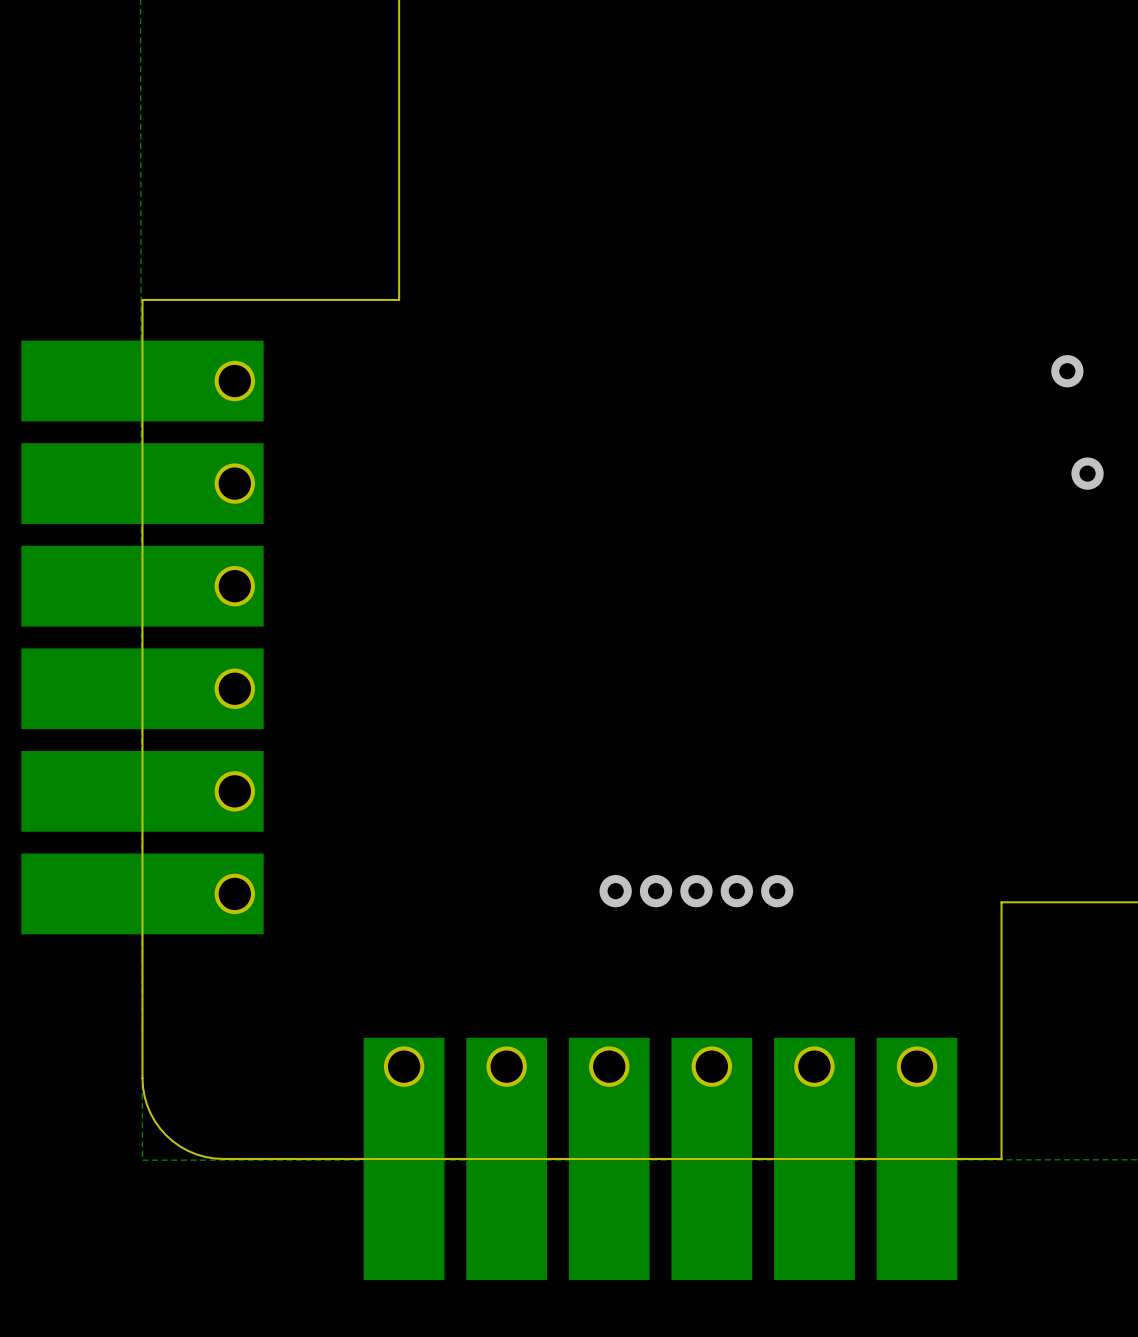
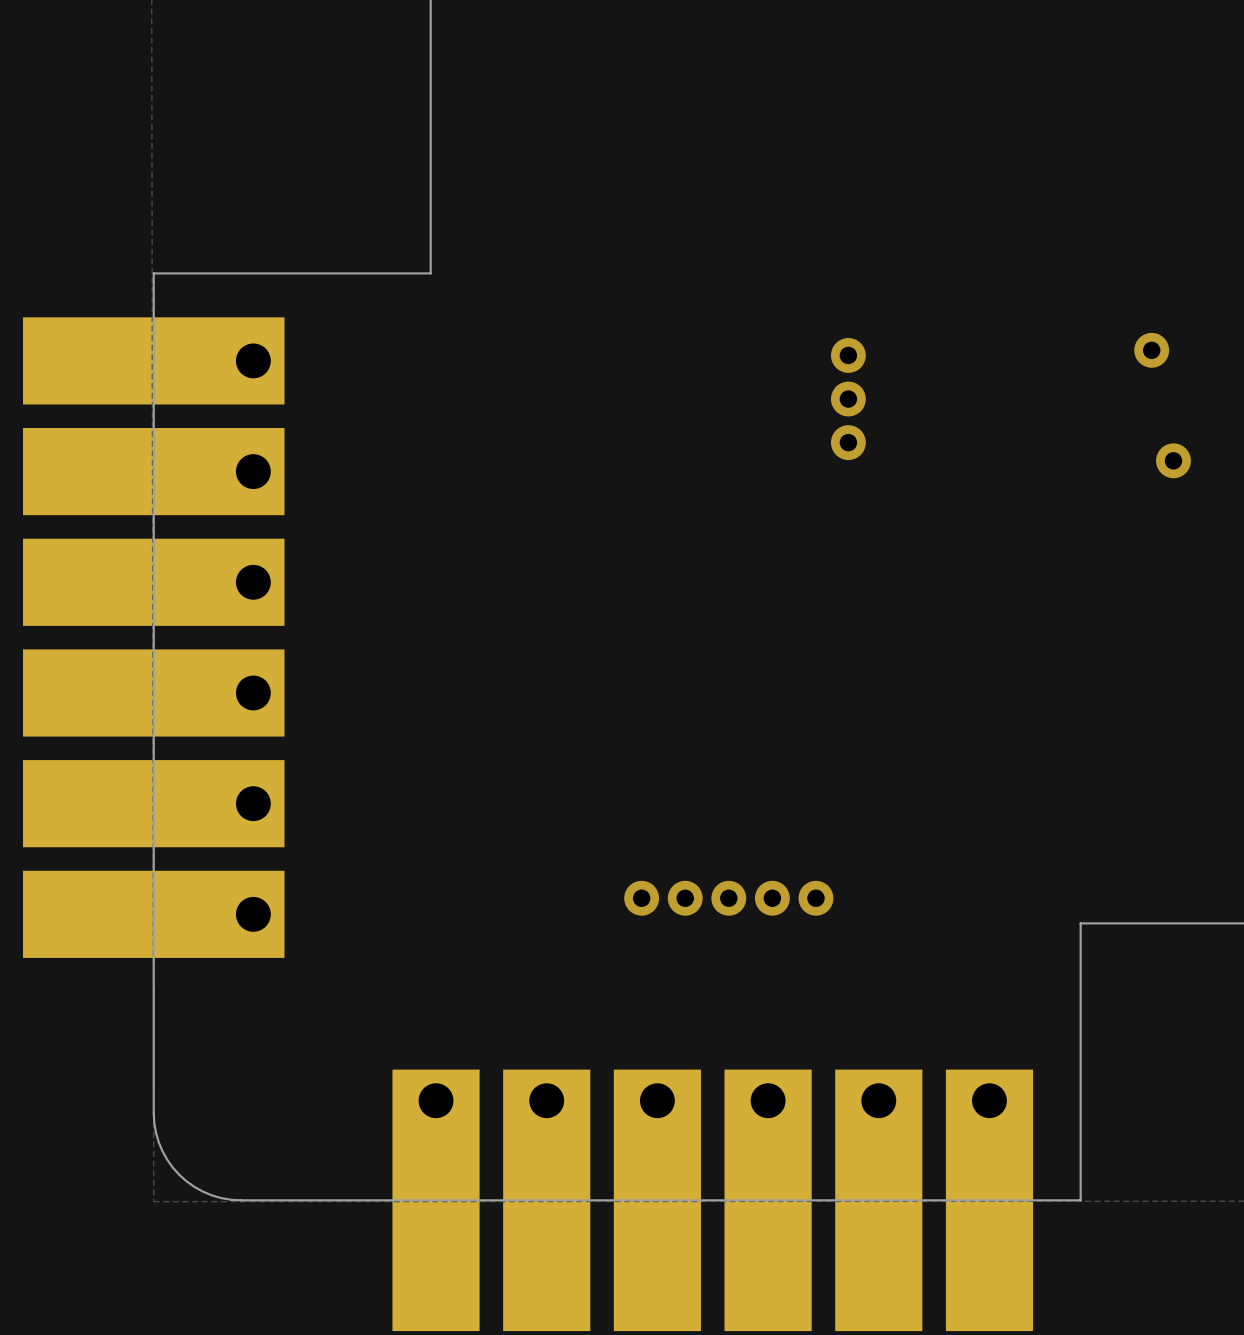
via: none -> (848, 355)
via: none -> (848, 399)
via: none -> (848, 442)
via: none -> (641, 898)
via: none -> (685, 898)
via: none -> (728, 898)
via: none -> (772, 898)
via: none -> (815, 898)
via: (615, 891) -> none
via: (656, 891) -> none
via: (696, 891) -> none
via: (736, 891) -> none
via: (777, 891) -> none

